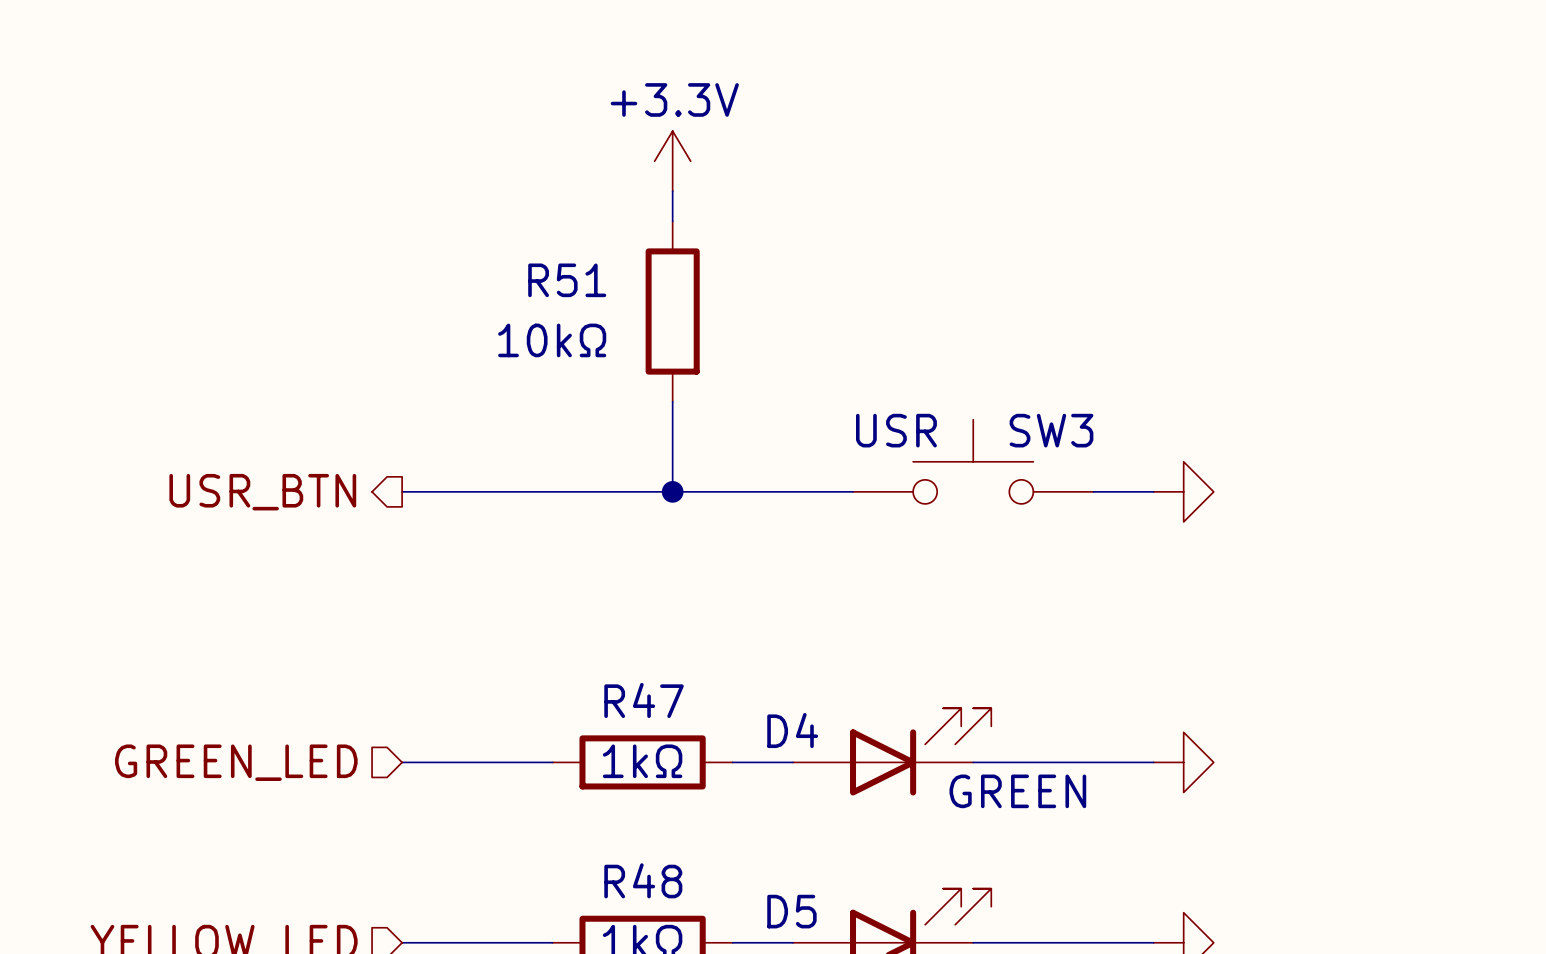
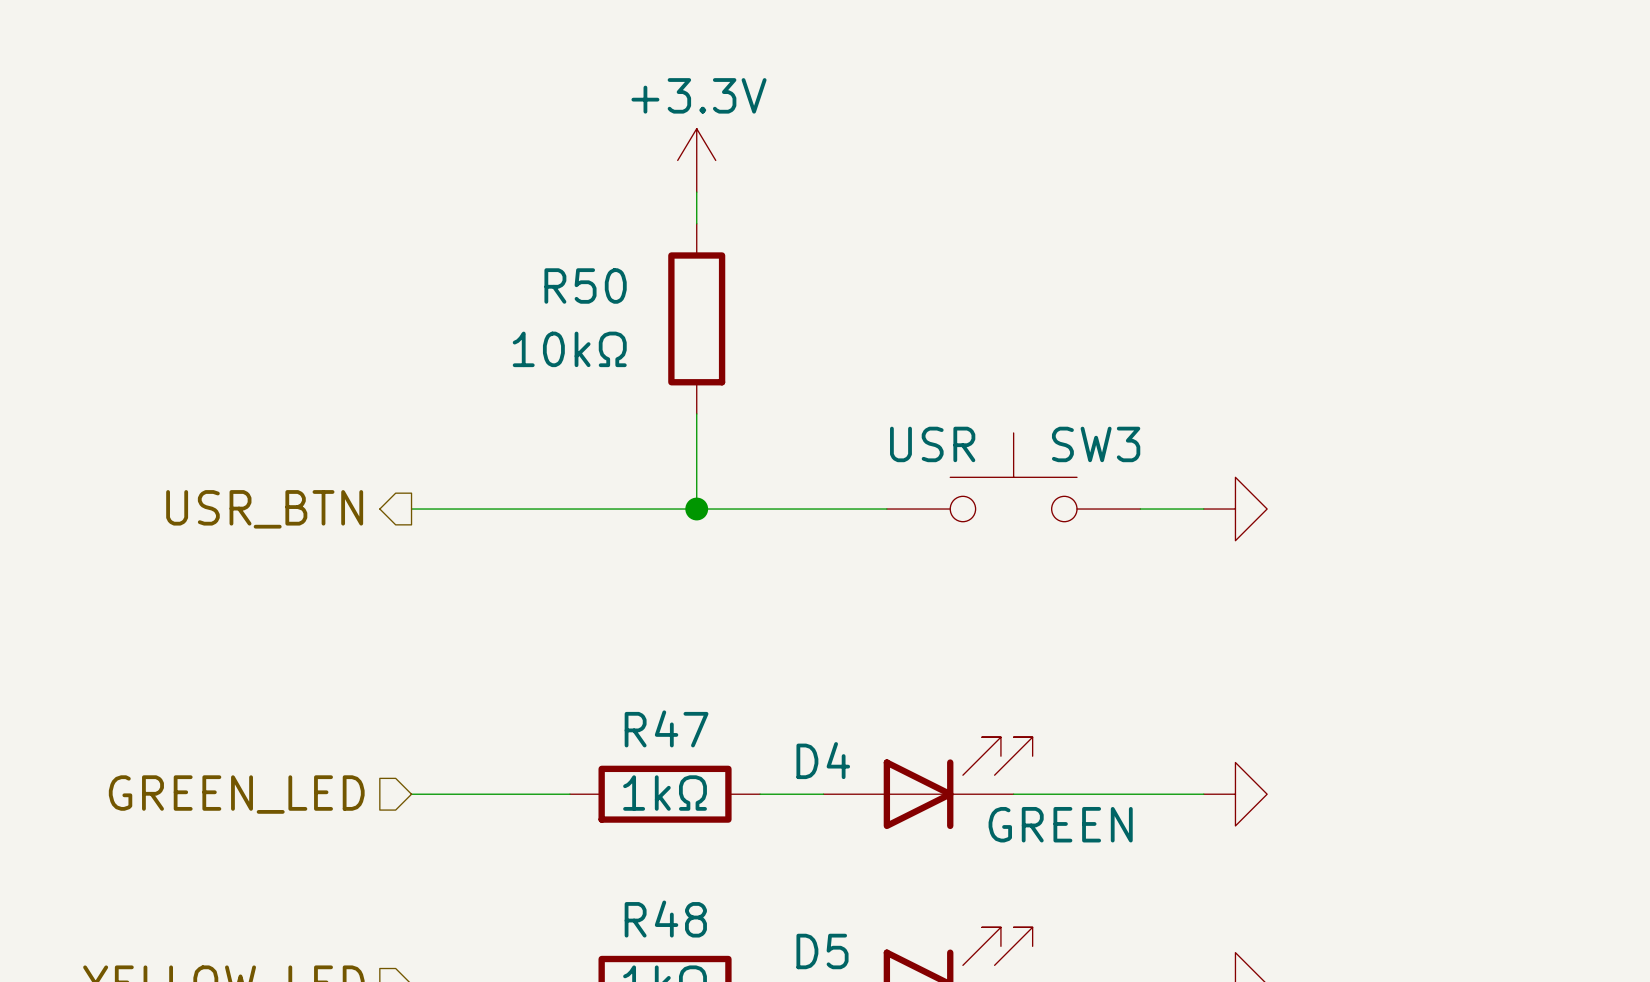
R51 name: R51 (567, 280) -> R50 (585, 286)

